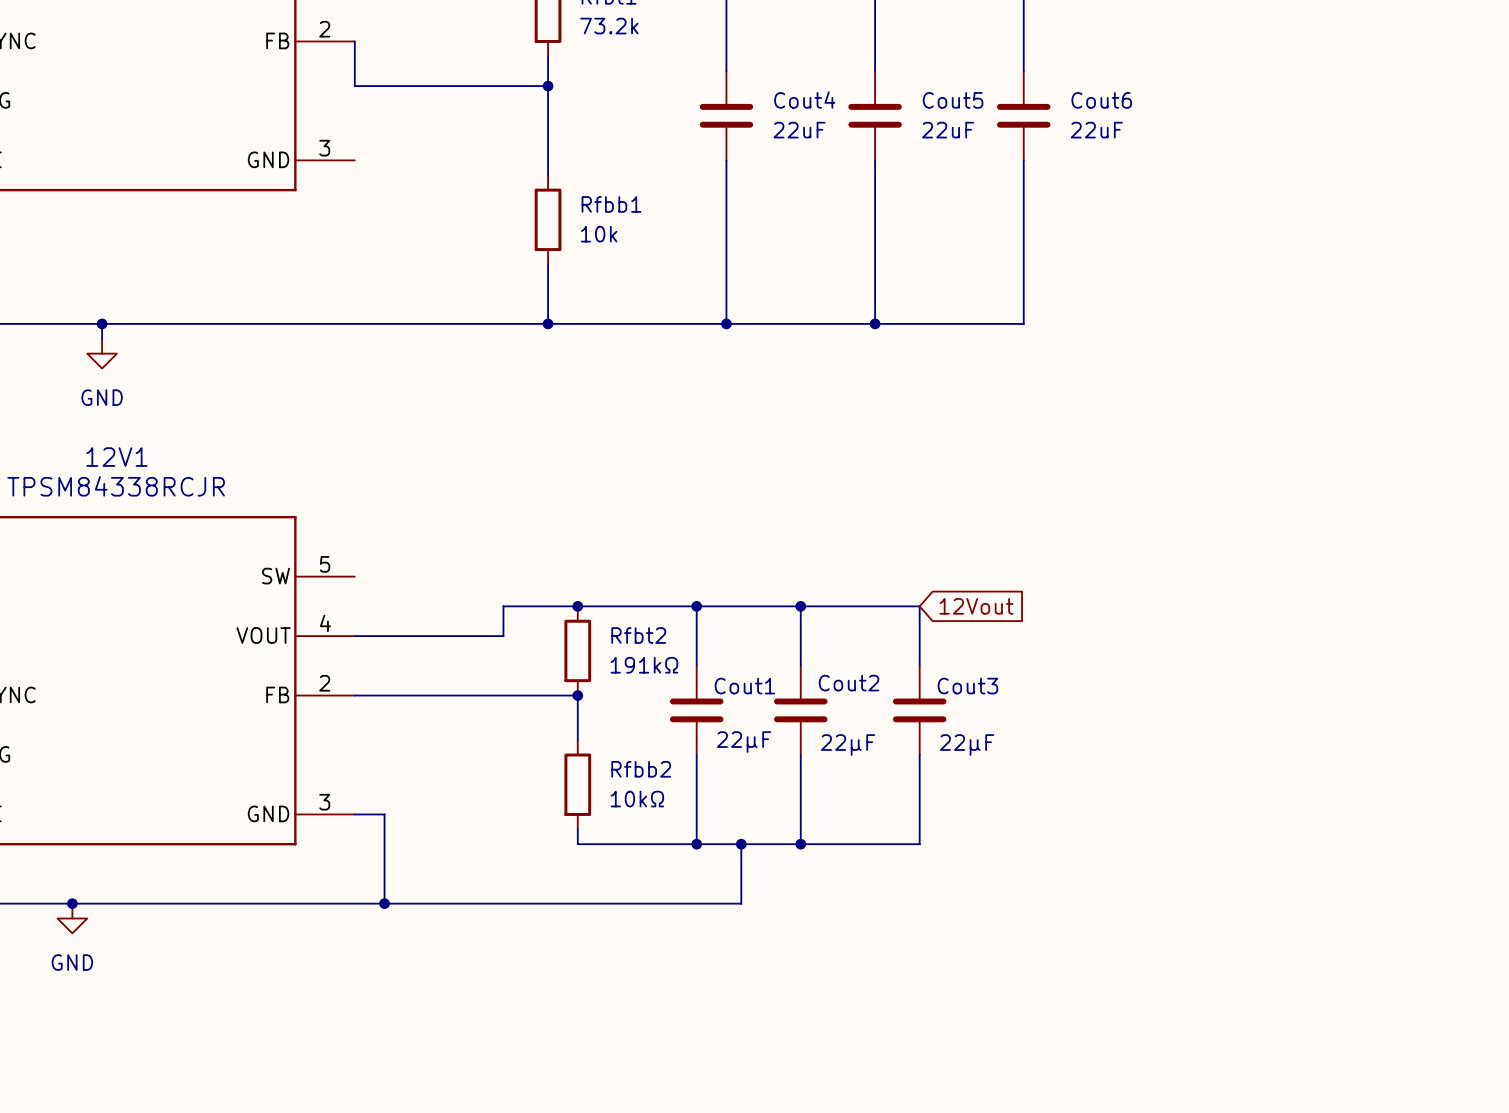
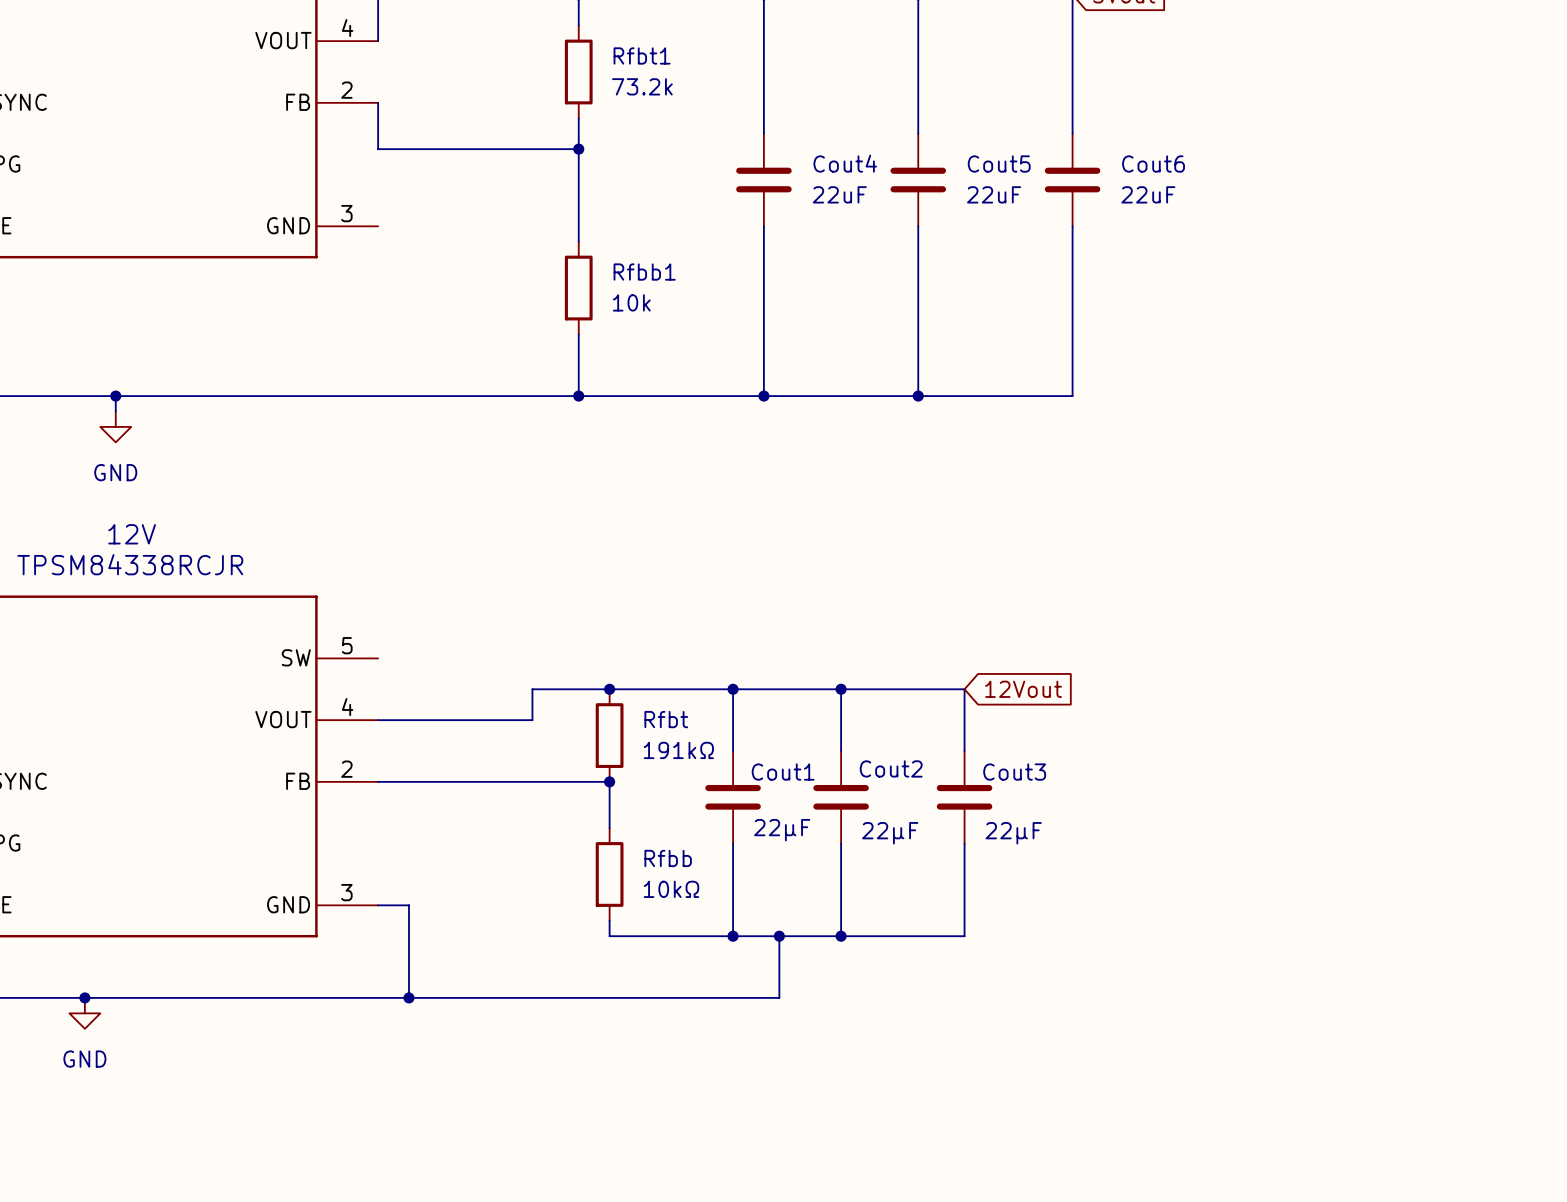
12V1 name: 12V1 (116, 457) -> 12V (132, 534)
Rfbt2 name: Rfbt2 (638, 635) -> Rfbt (666, 719)
Rfbb2 name: Rfbb2 (641, 769) -> Rfbb (668, 858)

